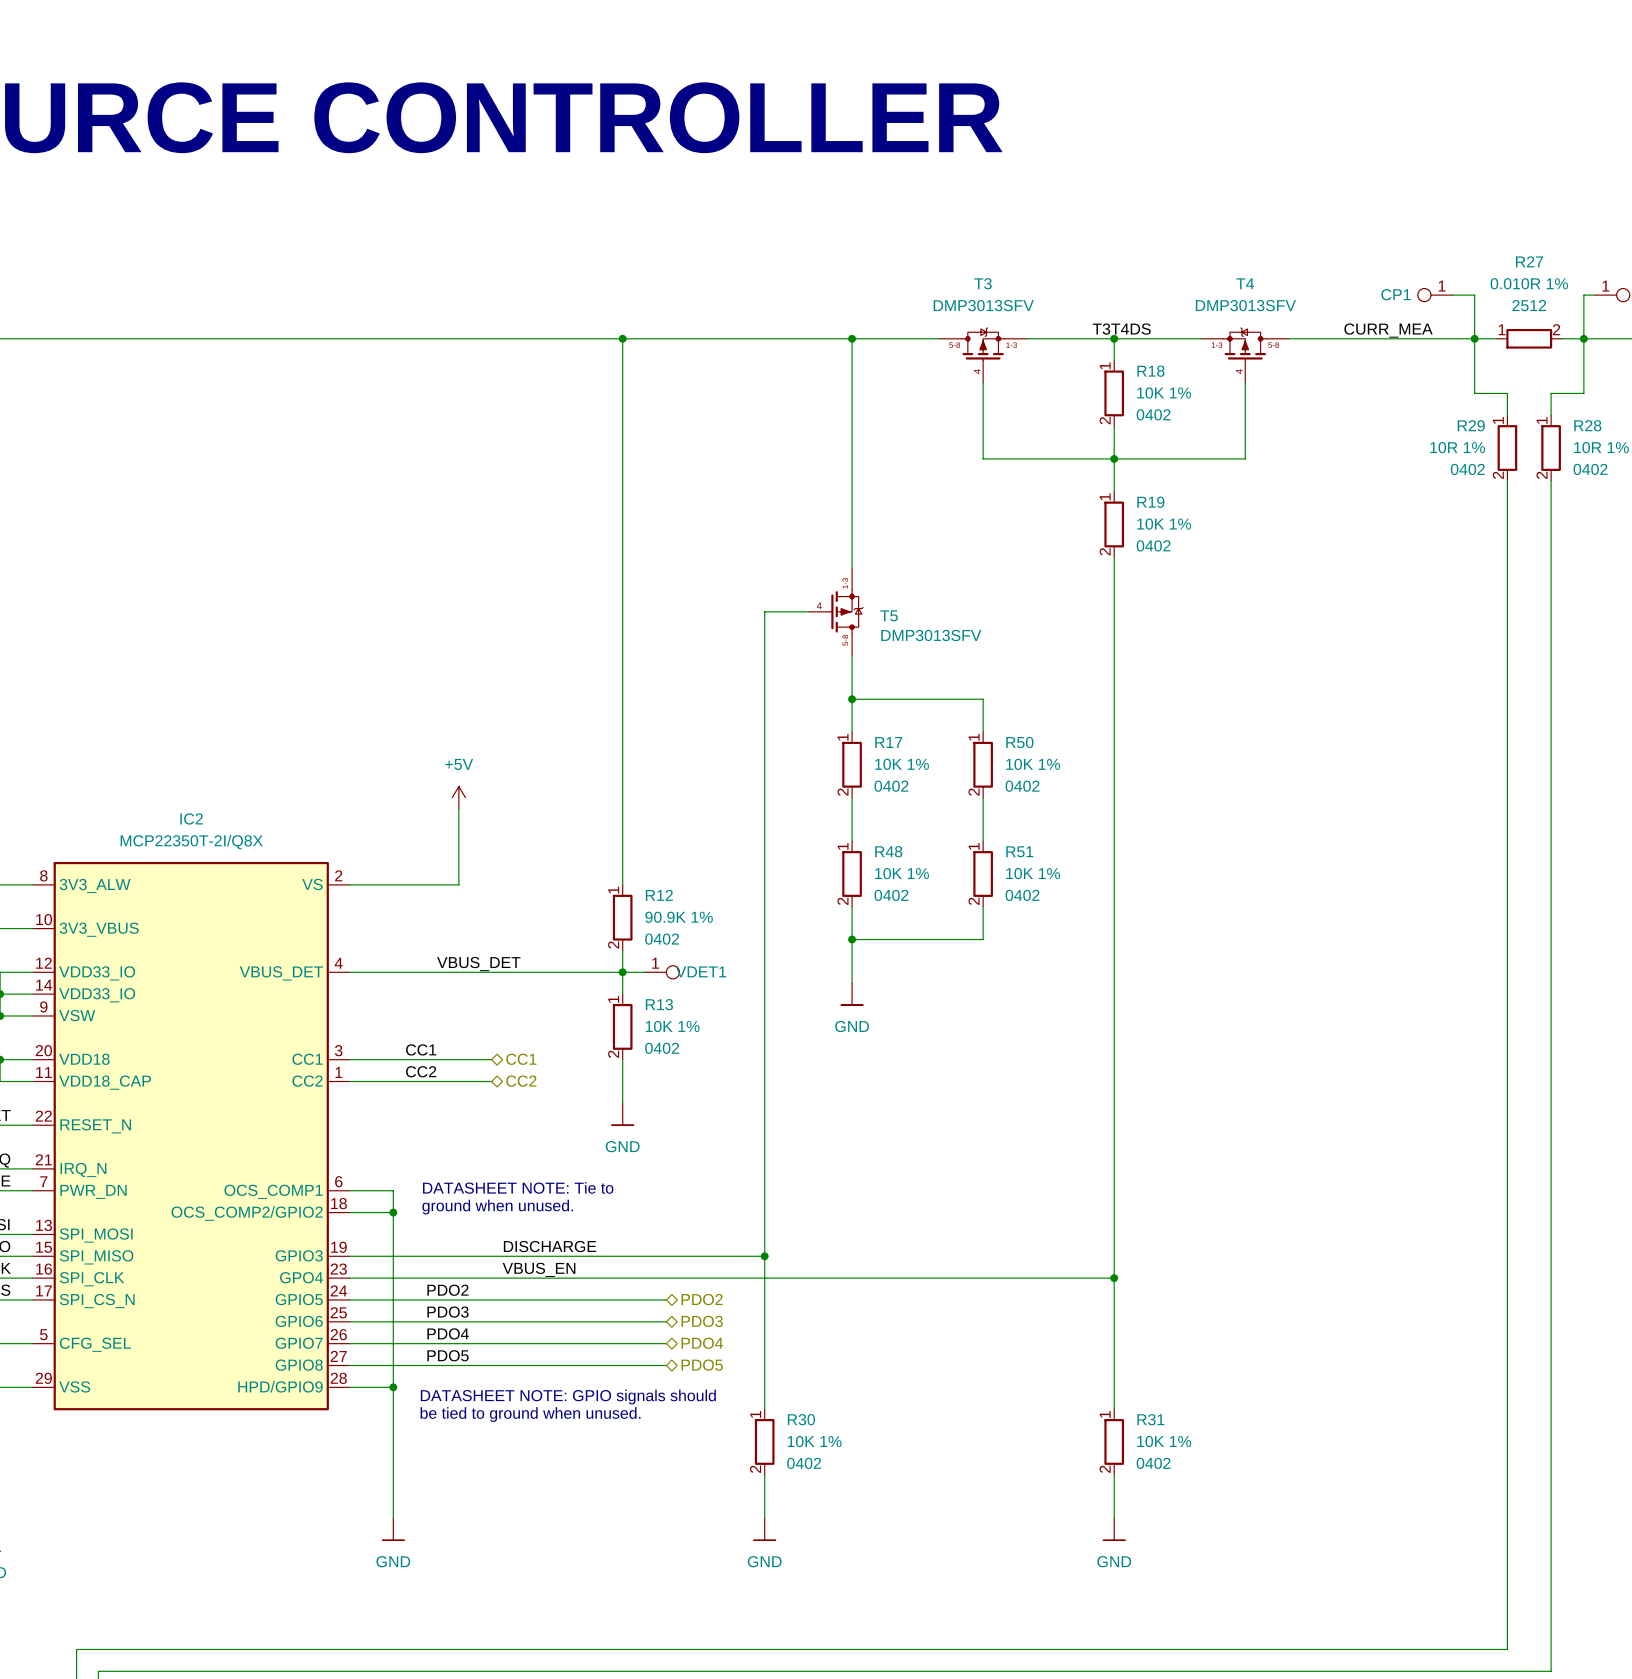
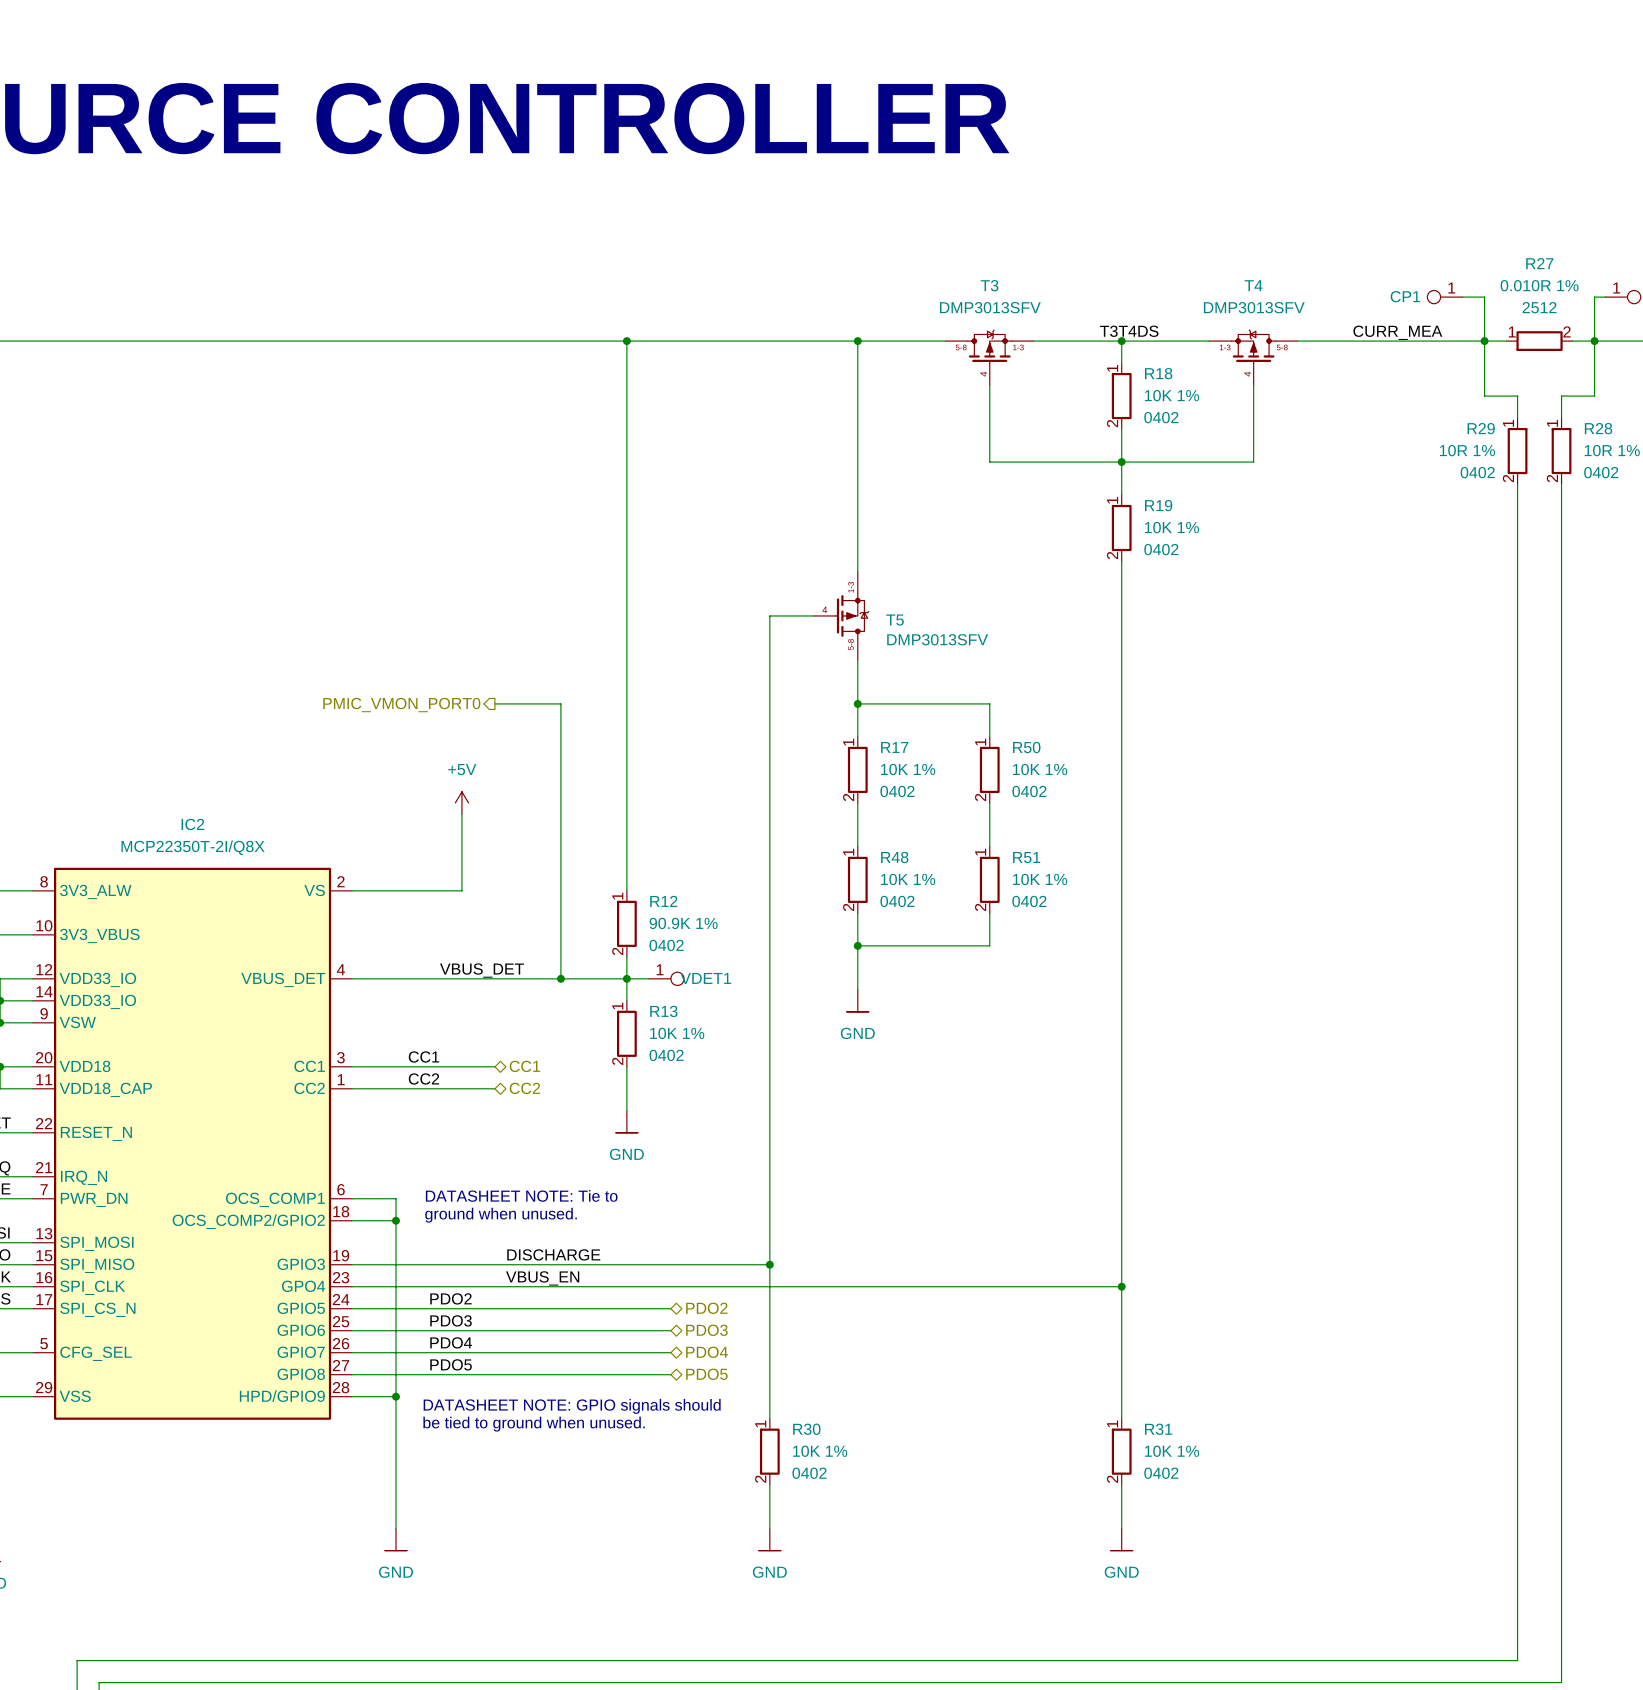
wire: none -> (494, 703) (560, 703) (560, 978)
hierarchical label: none -> PMIC_VMON_PORT0 (401, 705)
junction: none -> (560, 978)

